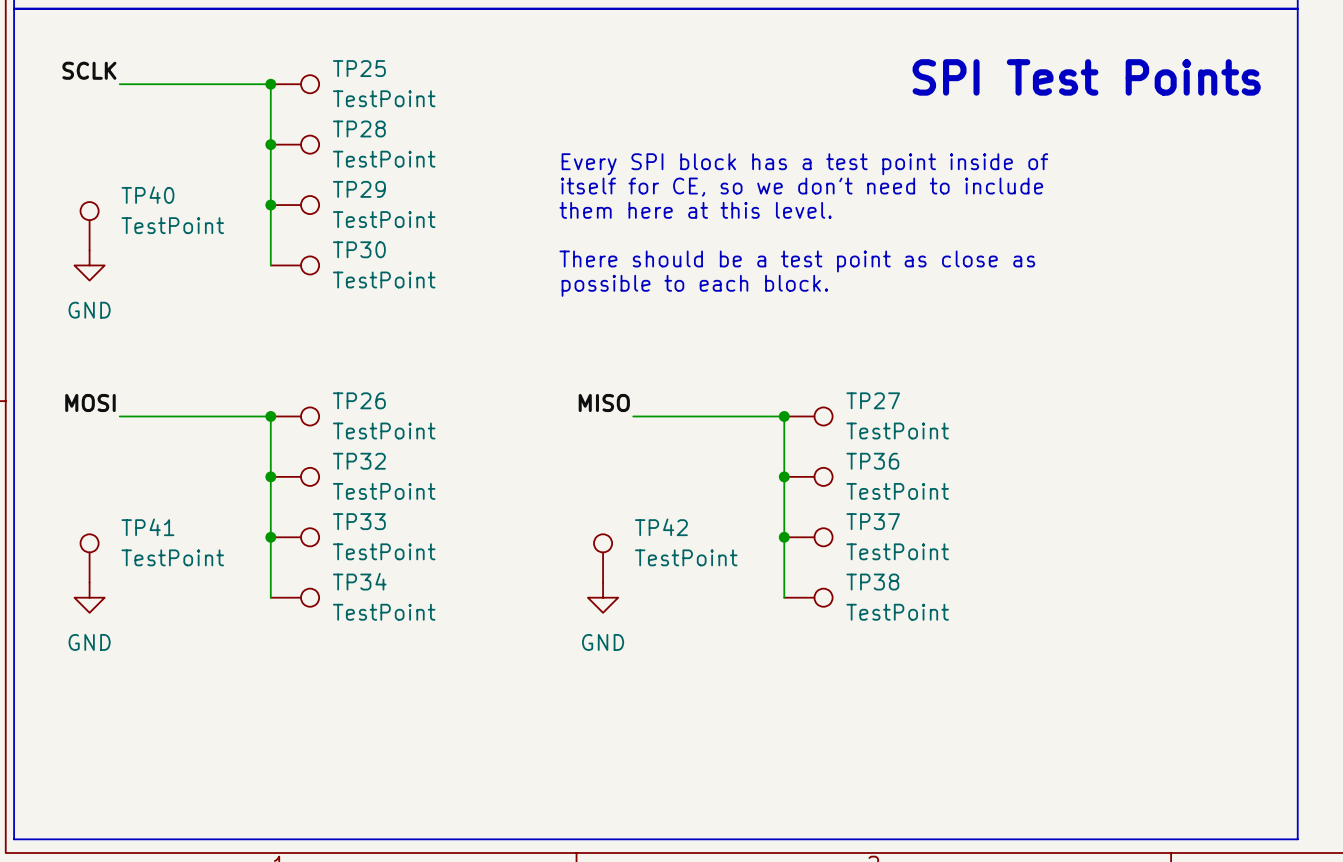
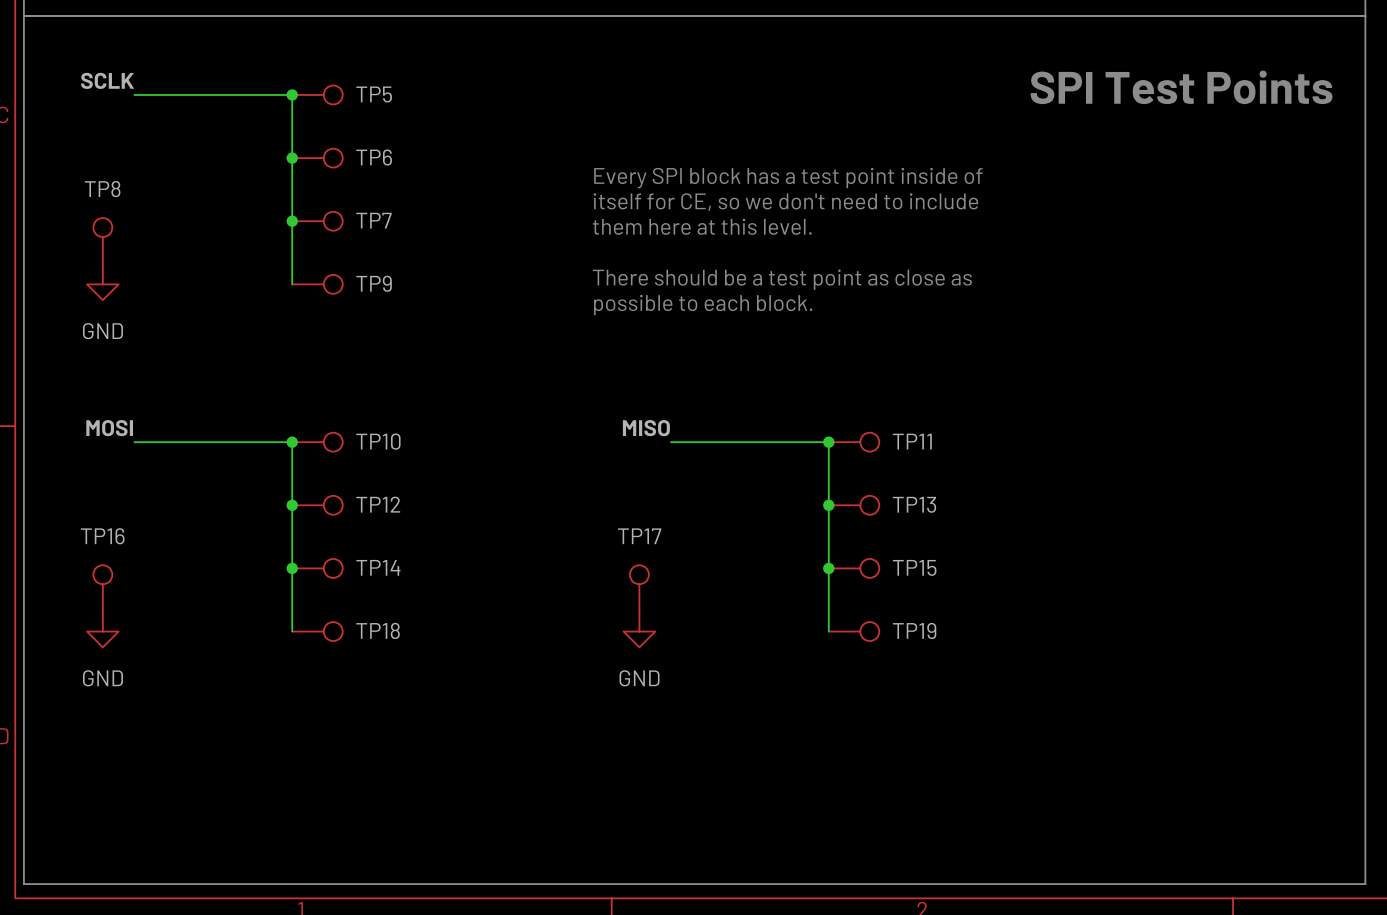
TP25 name: TP25 (359, 68) -> TP5 (374, 94)
TP25 value: TestPoint (384, 98) -> none
TP28 name: TP28 (359, 128) -> TP6 (374, 157)
TP28 value: TestPoint (384, 159) -> none
TP29 name: TP29 (359, 189) -> TP7 (374, 220)
TP40 name: TP40 (147, 195) -> TP8 (102, 189)
TP29 value: TestPoint (384, 219) -> none
TP40 value: TestPoint (172, 225) -> none
TP30 name: TP30 (359, 249) -> TP9 (374, 283)
TP30 value: TestPoint (384, 279) -> none
TP26 name: TP26 (359, 400) -> TP10 (378, 441)
TP27 name: TP27 (873, 400) -> TP11 (912, 441)
TP26 value: TestPoint (384, 431) -> none
TP27 value: TestPoint (897, 431) -> none
TP32 name: TP32 (359, 461) -> TP12 (378, 504)
TP36 name: TP36 (872, 461) -> TP13 (914, 504)
TP32 value: TestPoint (384, 491) -> none
TP36 value: TestPoint (897, 491) -> none
TP33 name: TP33 (359, 521) -> TP14 (378, 567)
TP37 name: TP37 (873, 521) -> TP15 (914, 567)
TP41 name: TP41 (147, 527) -> TP16 (102, 536)
TP42 name: TP42 (661, 527) -> TP17 (639, 536)
TP33 value: TestPoint (384, 551) -> none
TP37 value: TestPoint (897, 551) -> none
TP41 value: TestPoint (172, 557) -> none
TP42 value: TestPoint (686, 557) -> none
TP34 name: TP34 (359, 581) -> TP18 (378, 630)
TP38 name: TP38 (872, 582) -> TP19 (914, 630)
TP34 value: TestPoint (384, 612) -> none
TP38 value: TestPoint (897, 612) -> none

